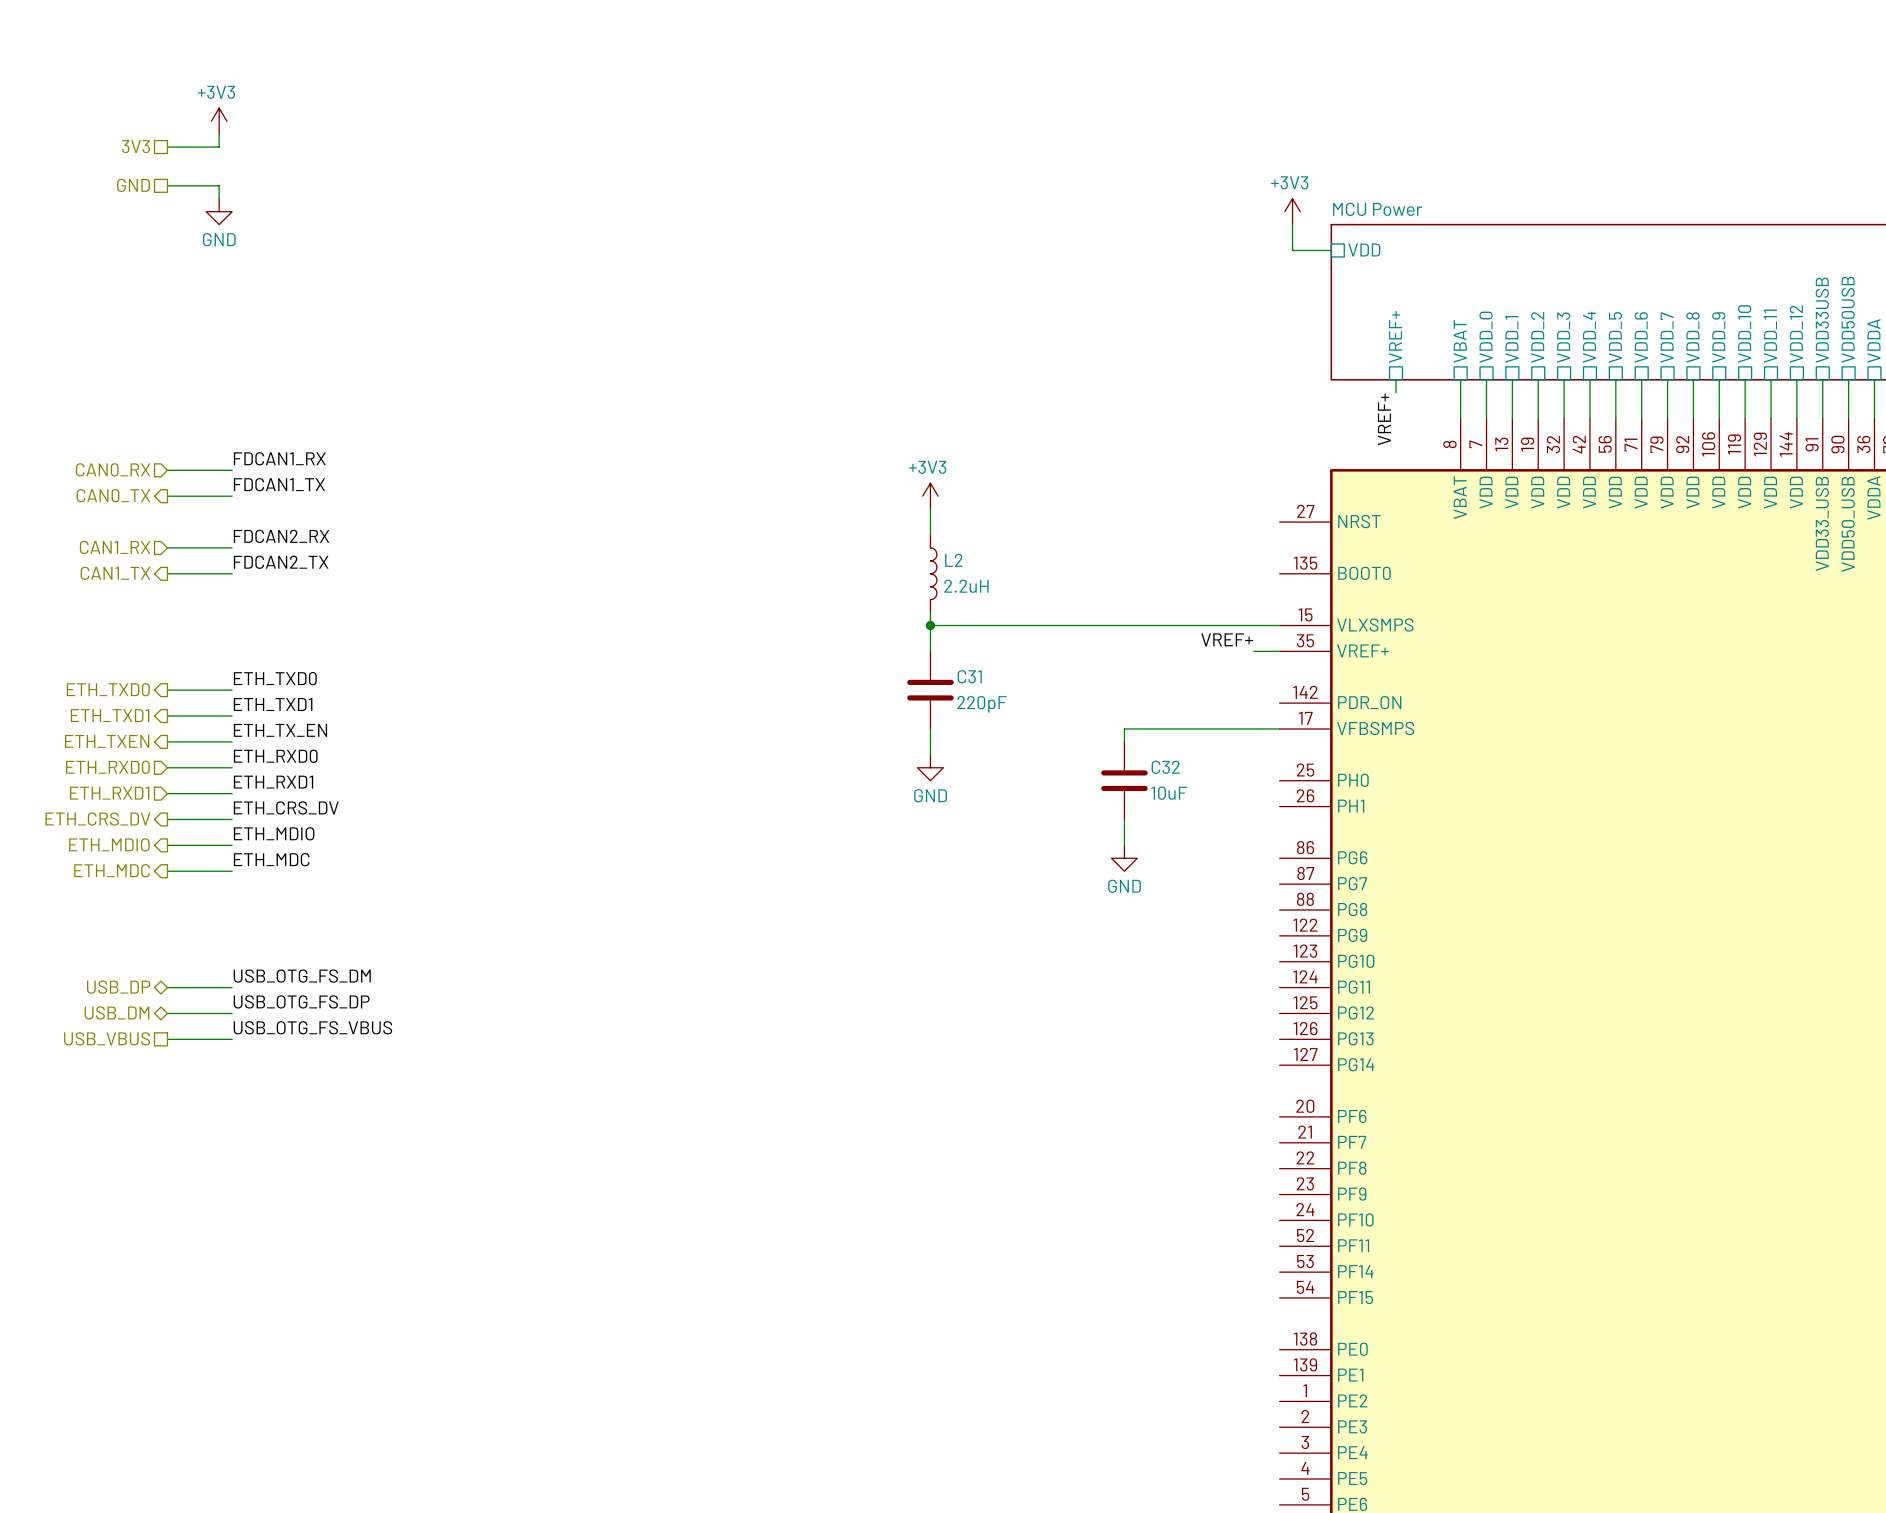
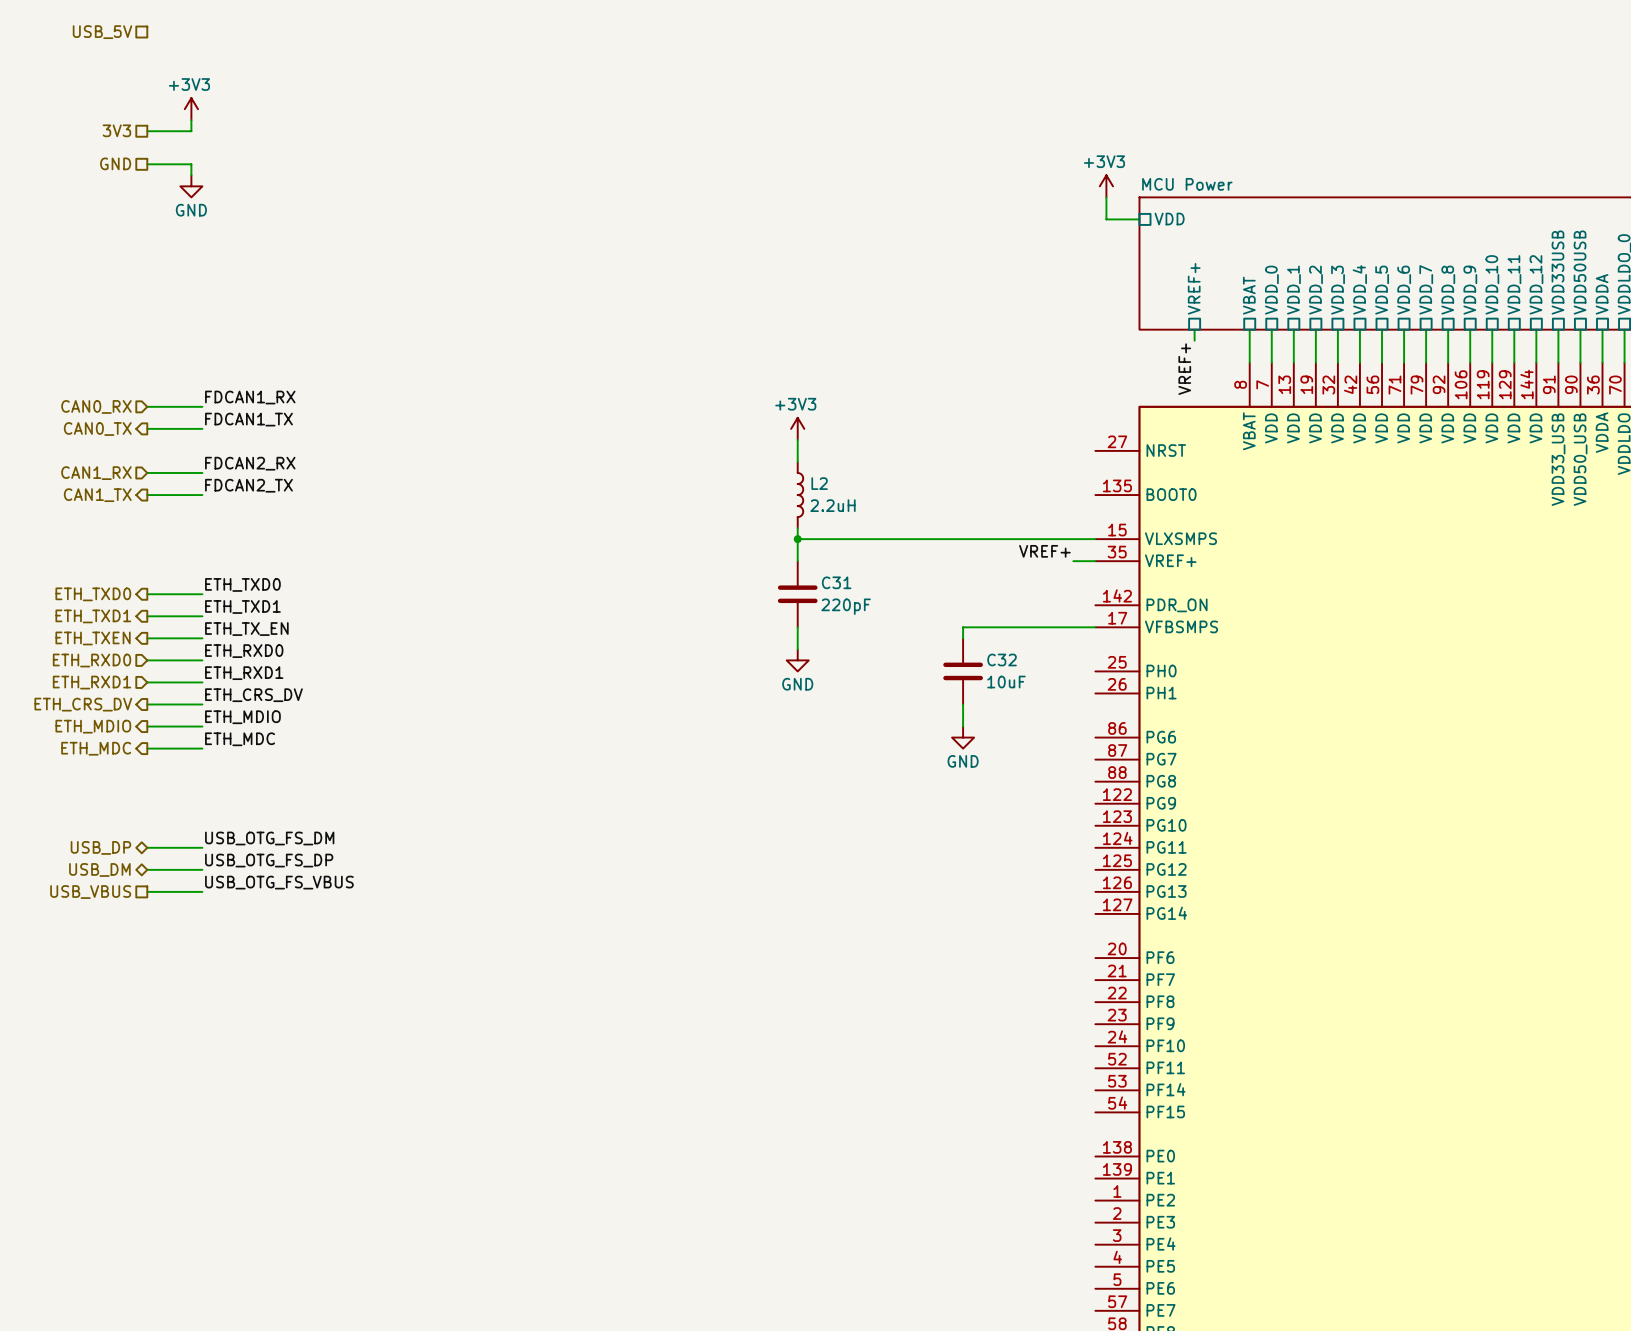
hierarchical label: none -> USB_5V (102, 32)

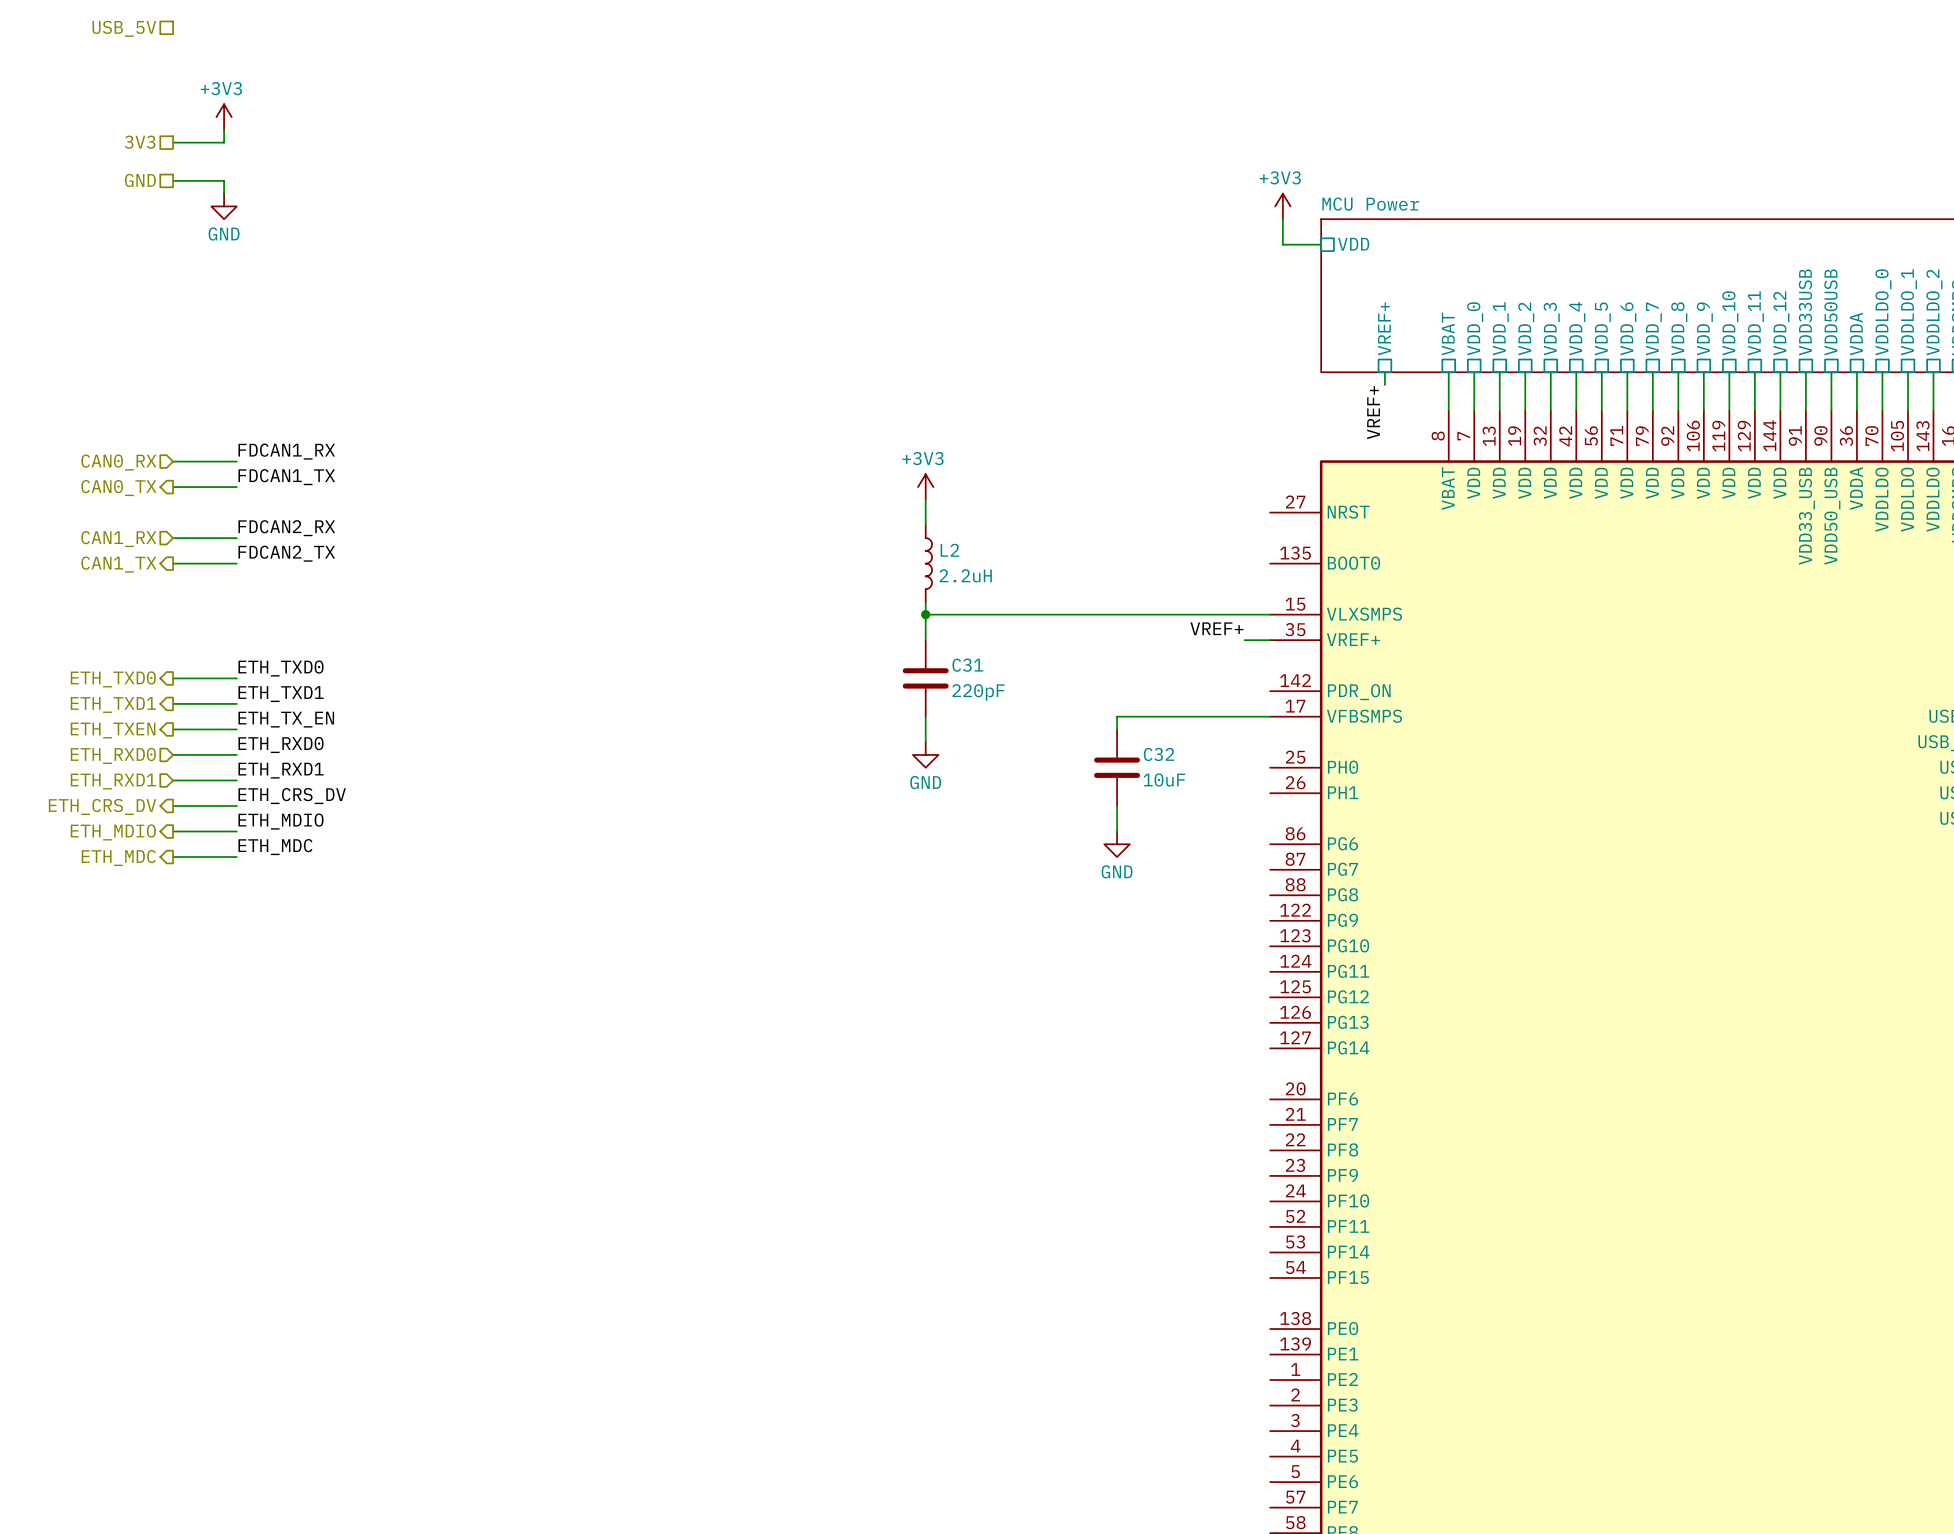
label: USB_OTG_FS_DM (269, 838) -> none
hierarchical label: USB_DP (100, 847) -> none
wire: (147, 847) (202, 847) -> none
label: USB_OTG_FS_DP (269, 860) -> none
hierarchical label: USB_DM (99, 869) -> none
wire: (147, 869) (202, 869) -> none
label: USB_OTG_FS_VBUS (279, 882) -> none
wire: (147, 891) (202, 891) -> none
hierarchical label: USB_VBUS (90, 892) -> none

